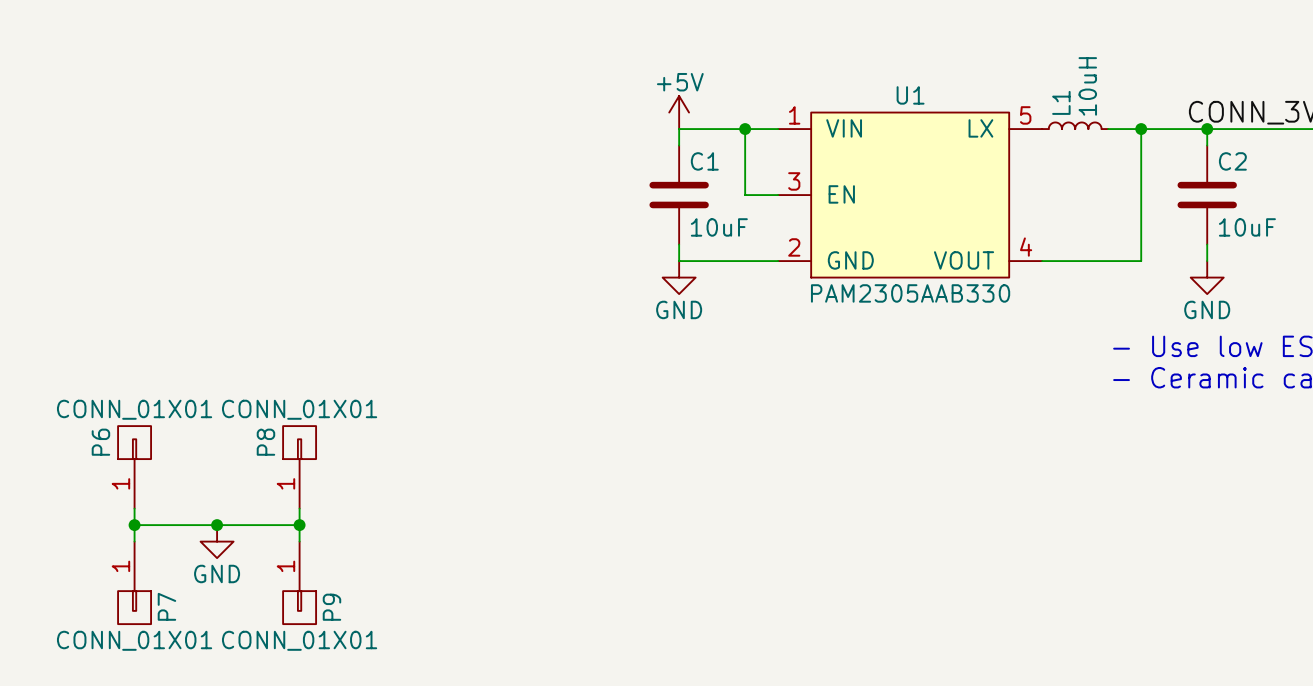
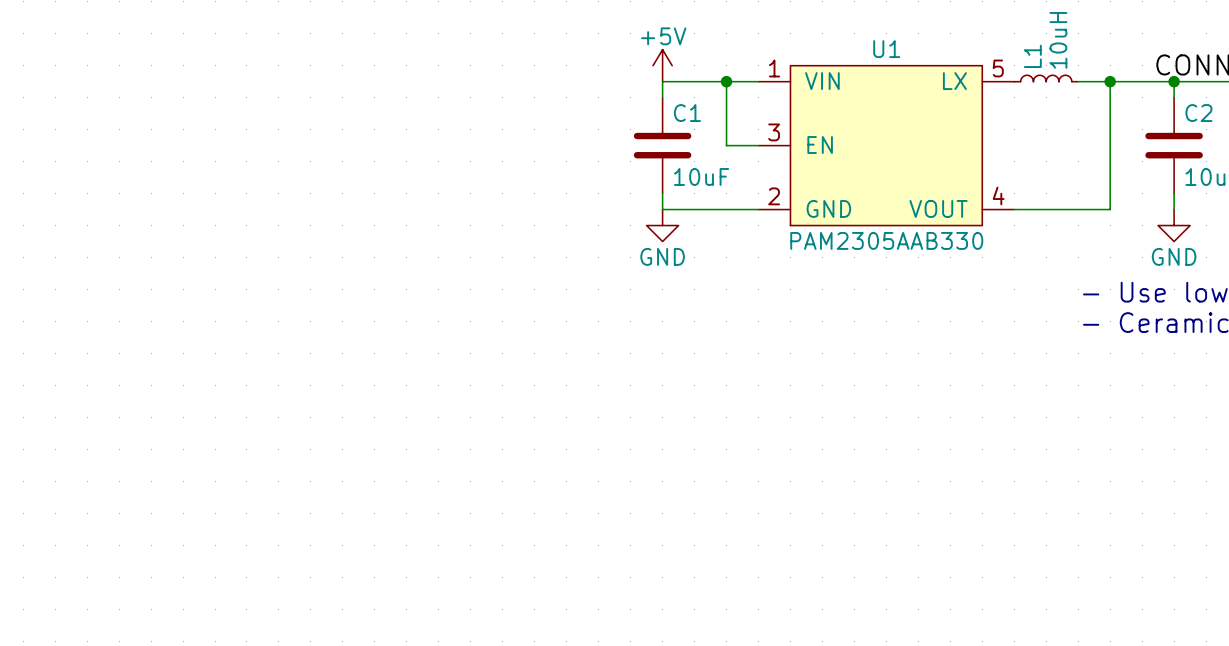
P6: CONN_01X01 (134, 467) -> none
P8: CONN_01X01 (299, 467) -> none
wire: (134, 508) (134, 541) -> none
wire: (299, 508) (299, 541) -> none
wire: (134, 525) (299, 525) -> none
junction: (134, 525) -> none
junction: (217, 525) -> none
junction: (299, 525) -> none
power symbol: GND (217, 541) -> none
P7: CONN_01X01 (134, 582) -> none
P9: CONN_01X01 (299, 582) -> none

